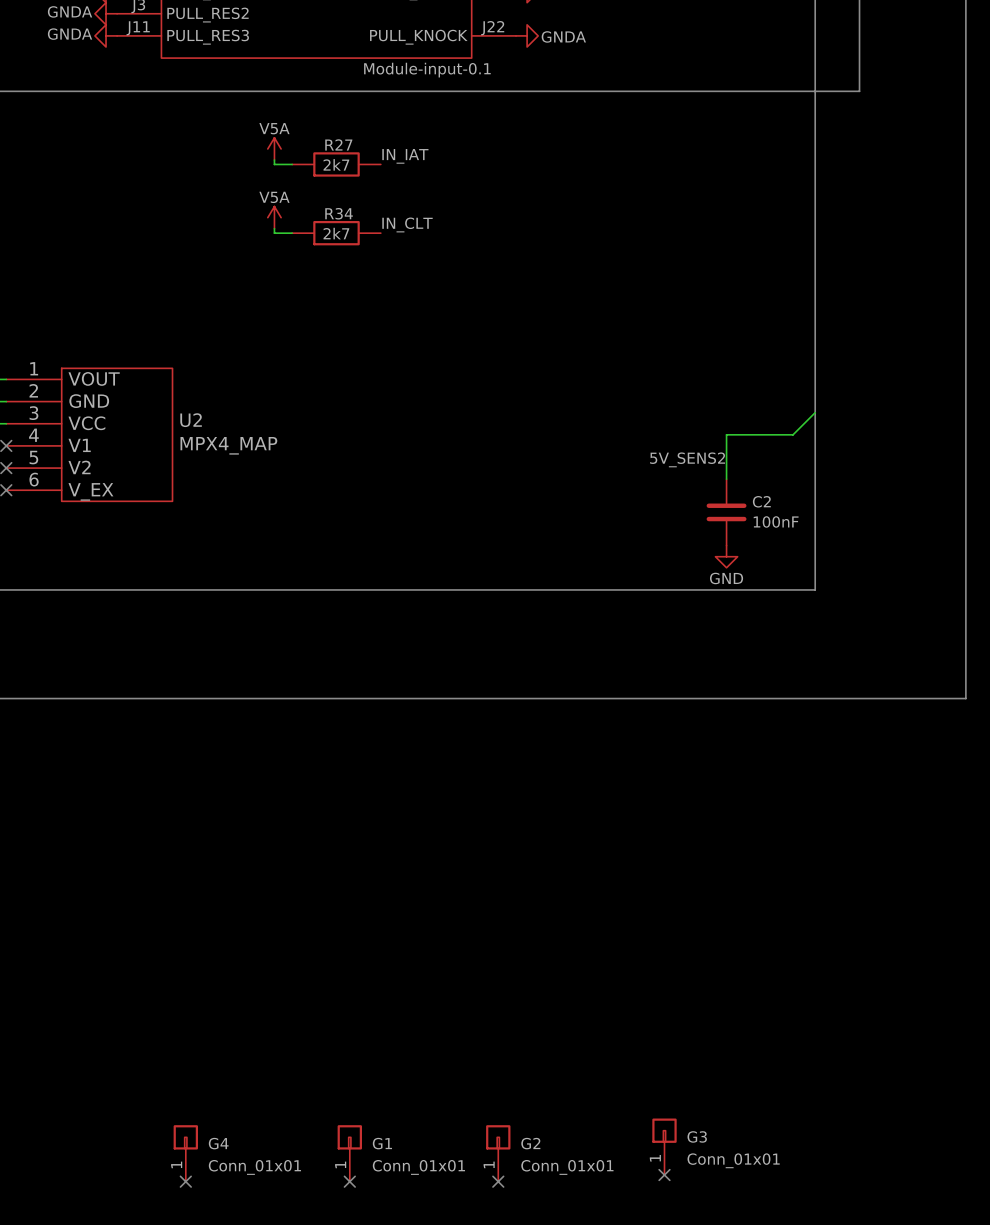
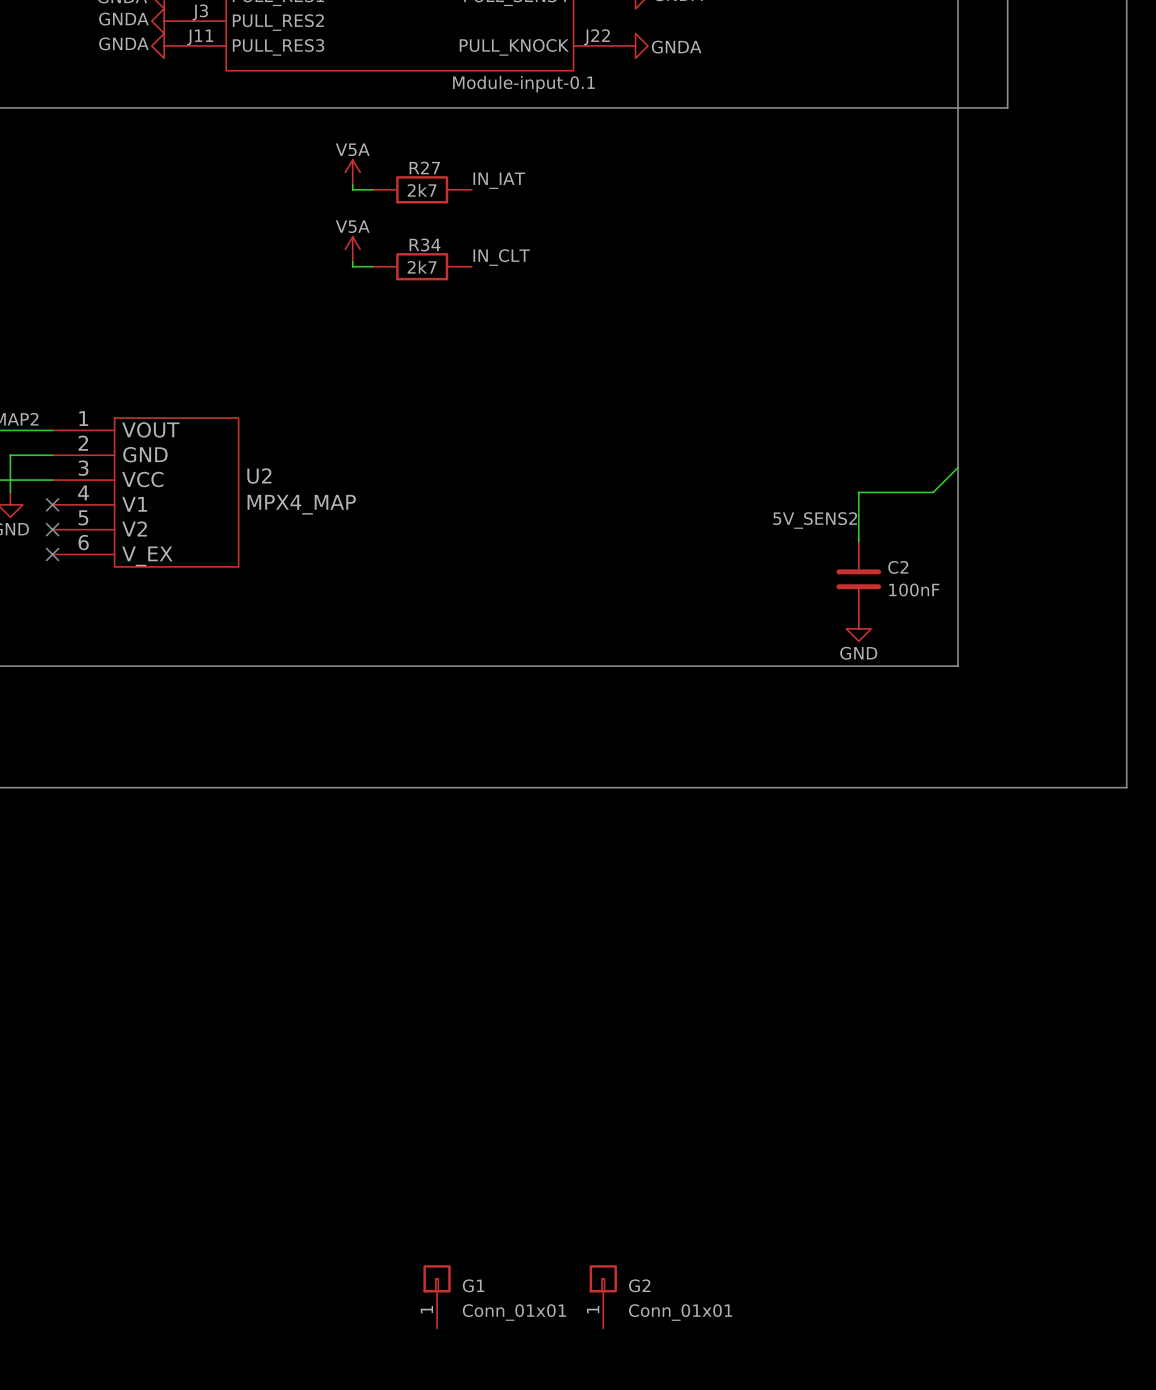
G3: Conn_01x01 (664, 1146) -> none
G4: Conn_01x01 (185, 1153) -> none
no-connect mark: (664, 1175) -> none
no-connect mark: (185, 1181) -> none
no-connect mark: (349, 1181) -> none
no-connect mark: (498, 1181) -> none

